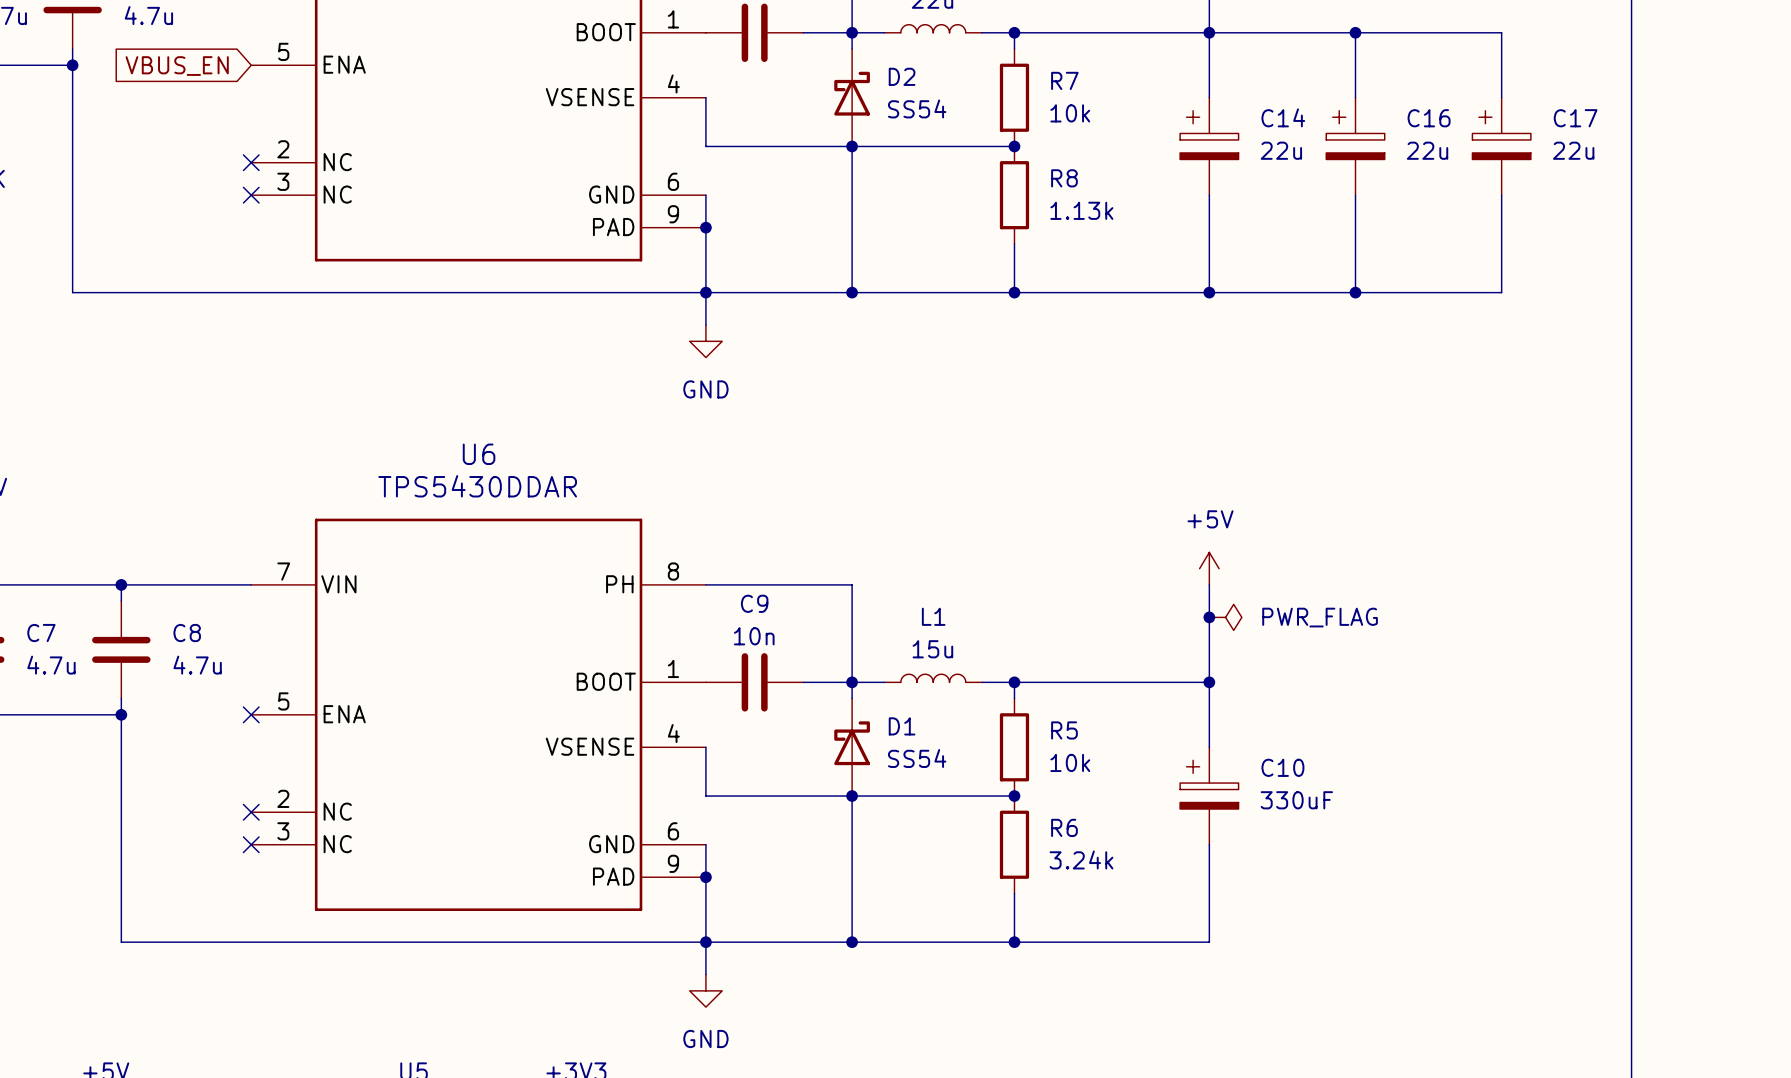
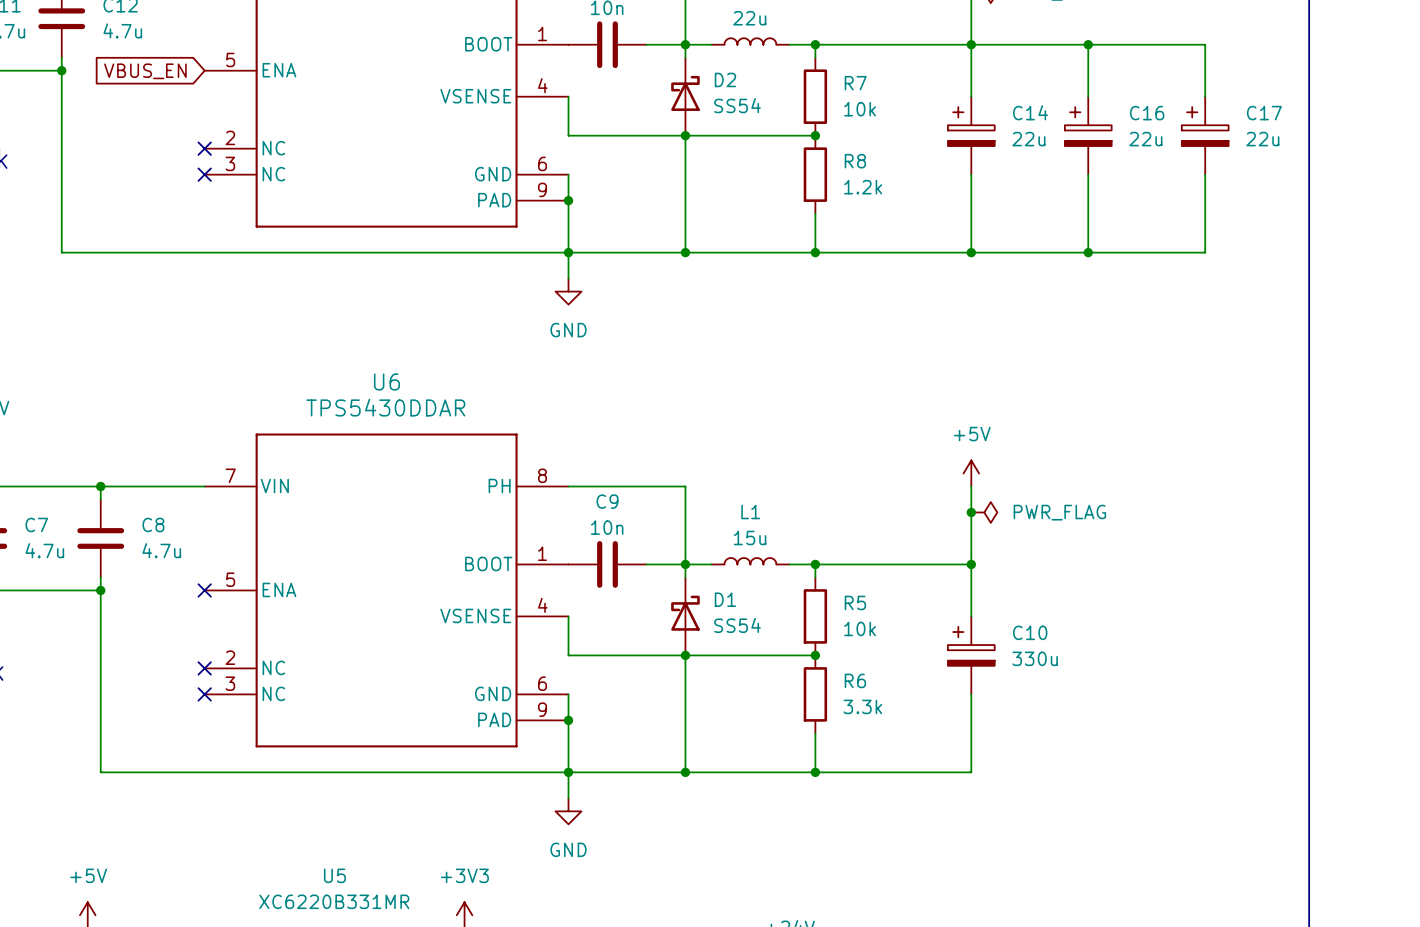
R8 value: 1.13k (1081, 210) -> 1.2k (863, 187)
C10 value: 330uF (1296, 800) -> 330u (1035, 658)
R6 value: 3.24k (1081, 859) -> 3.3k (862, 706)

